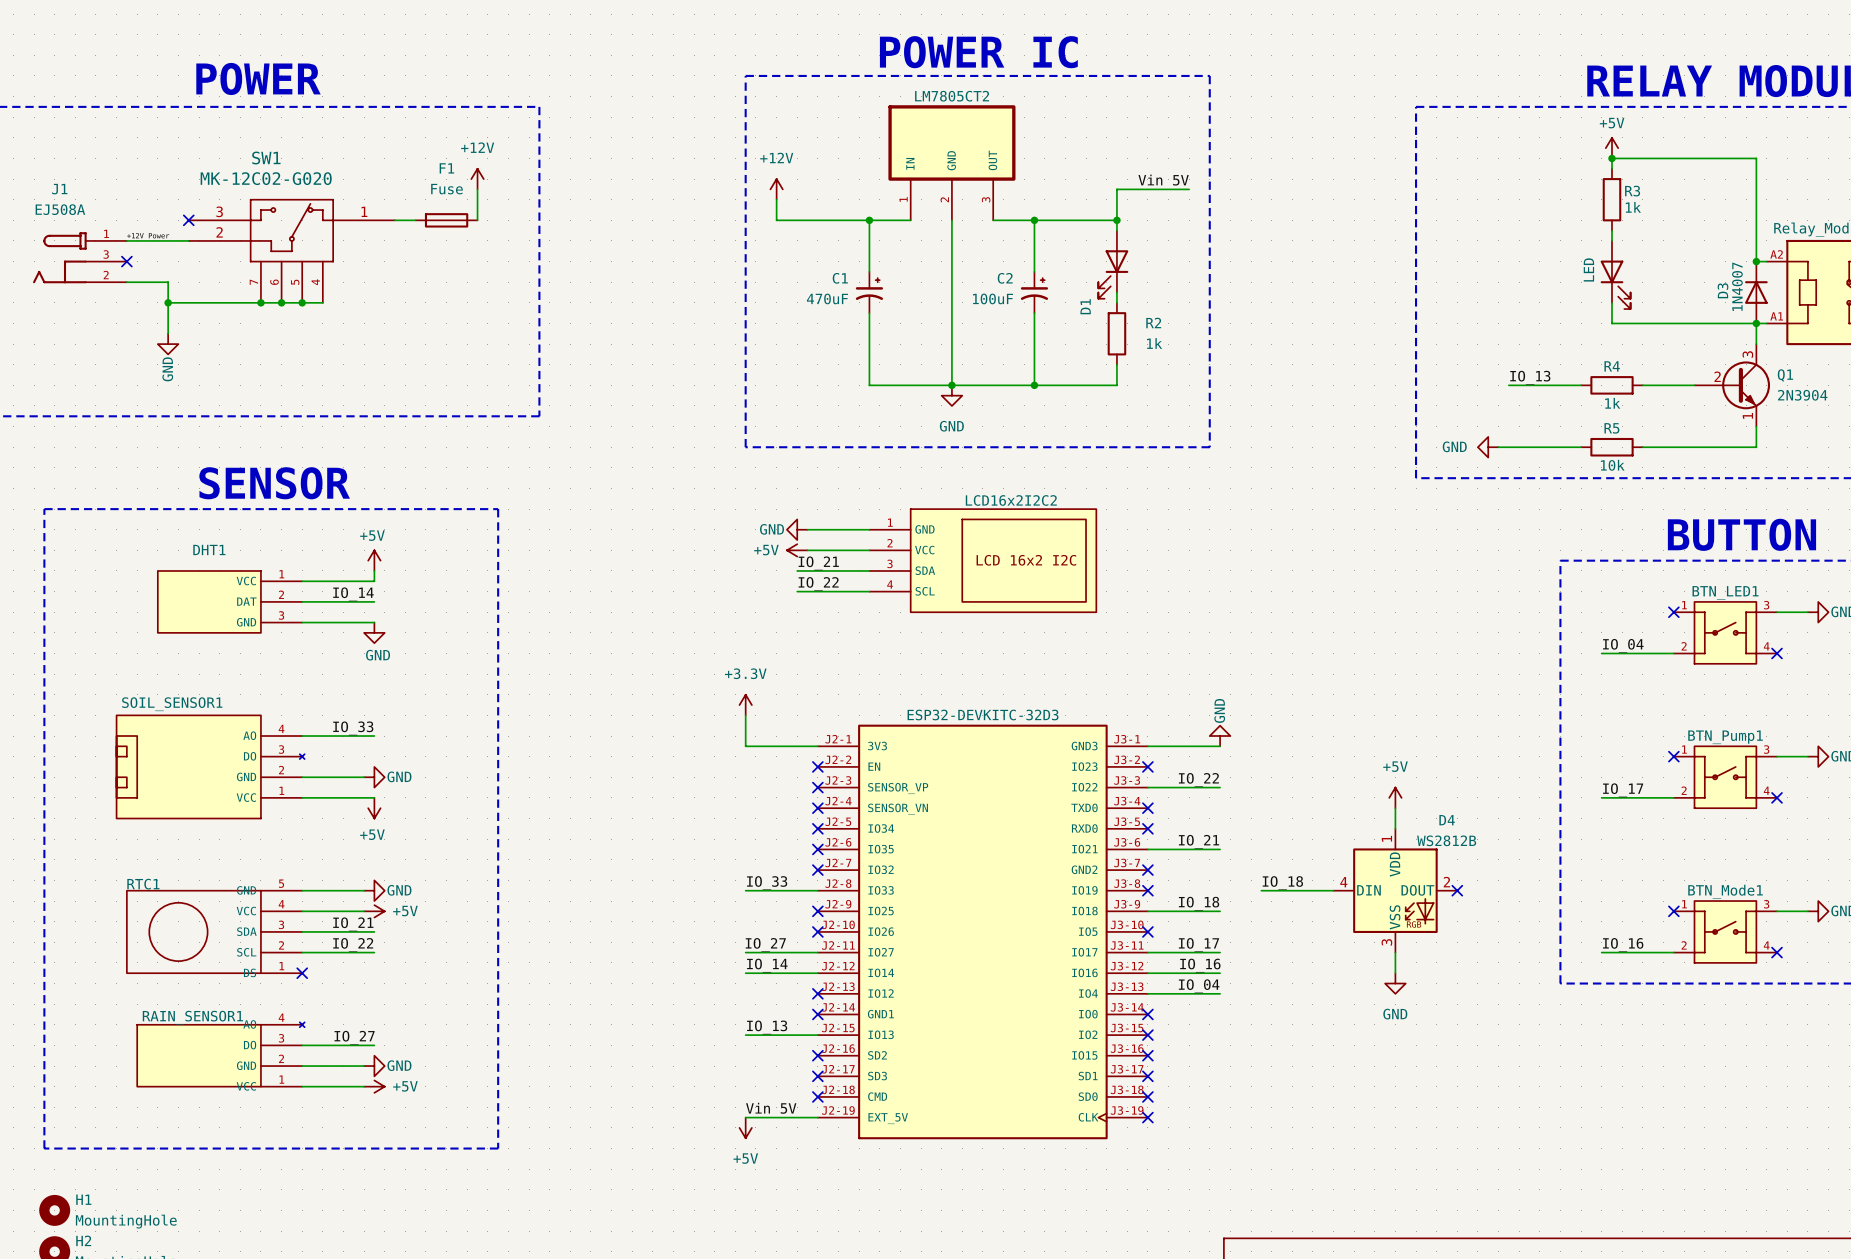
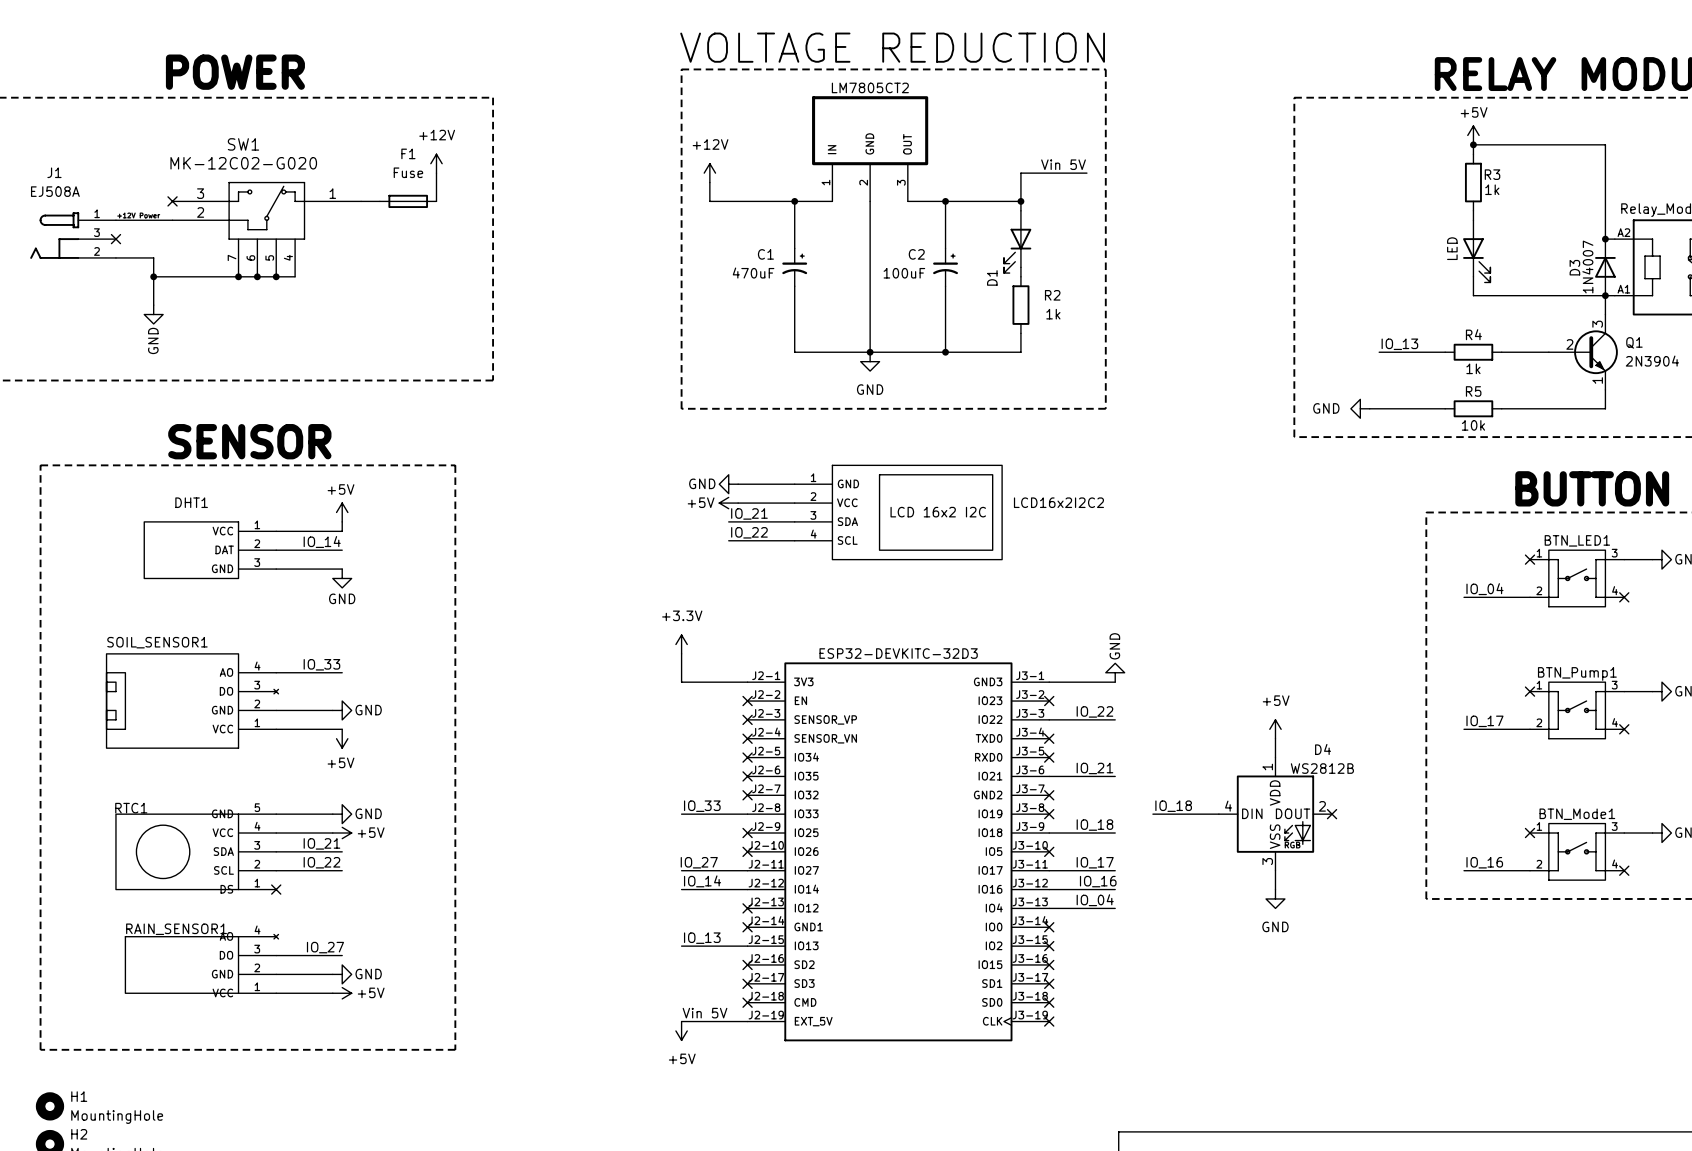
text: POWER IC (978, 52) -> VOLTAGE REDUCTION (892, 47)
LCD16x2I2C2 name position: LCD16x2I2C2 (1011, 500) -> LCD16x2I2C2 (1058, 502)

